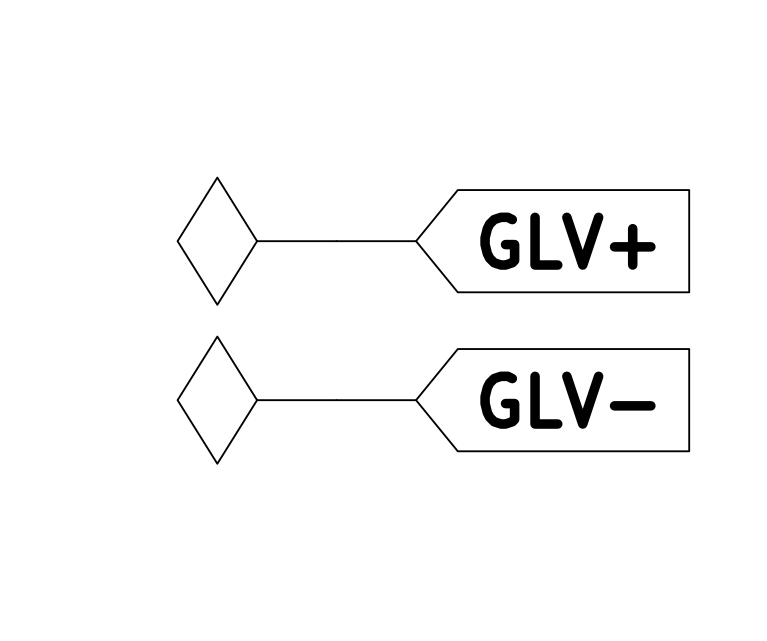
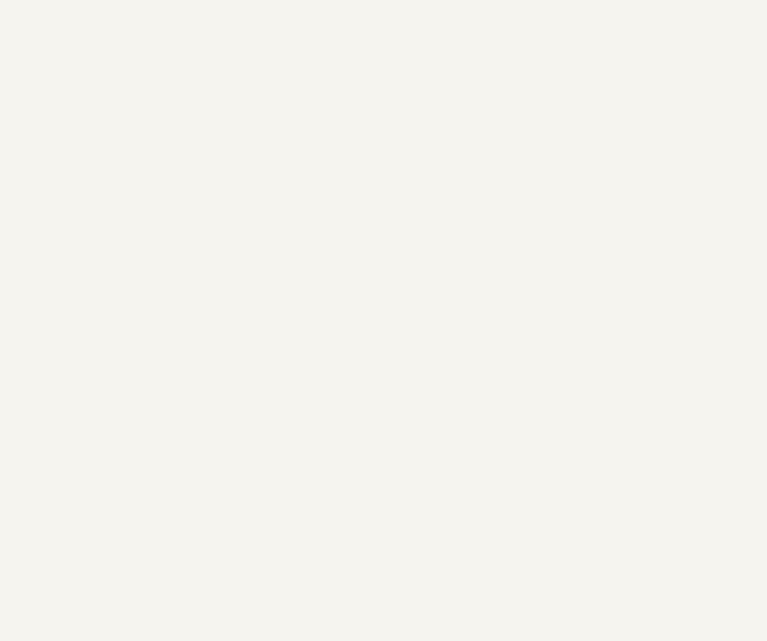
power symbol: (257, 241) -> none
wire: (336, 241) (416, 241) -> none
global label: GLV+ (567, 241) -> none
power symbol: (257, 400) -> none
wire: (336, 400) (416, 400) -> none
global label: GLV- (567, 400) -> none

